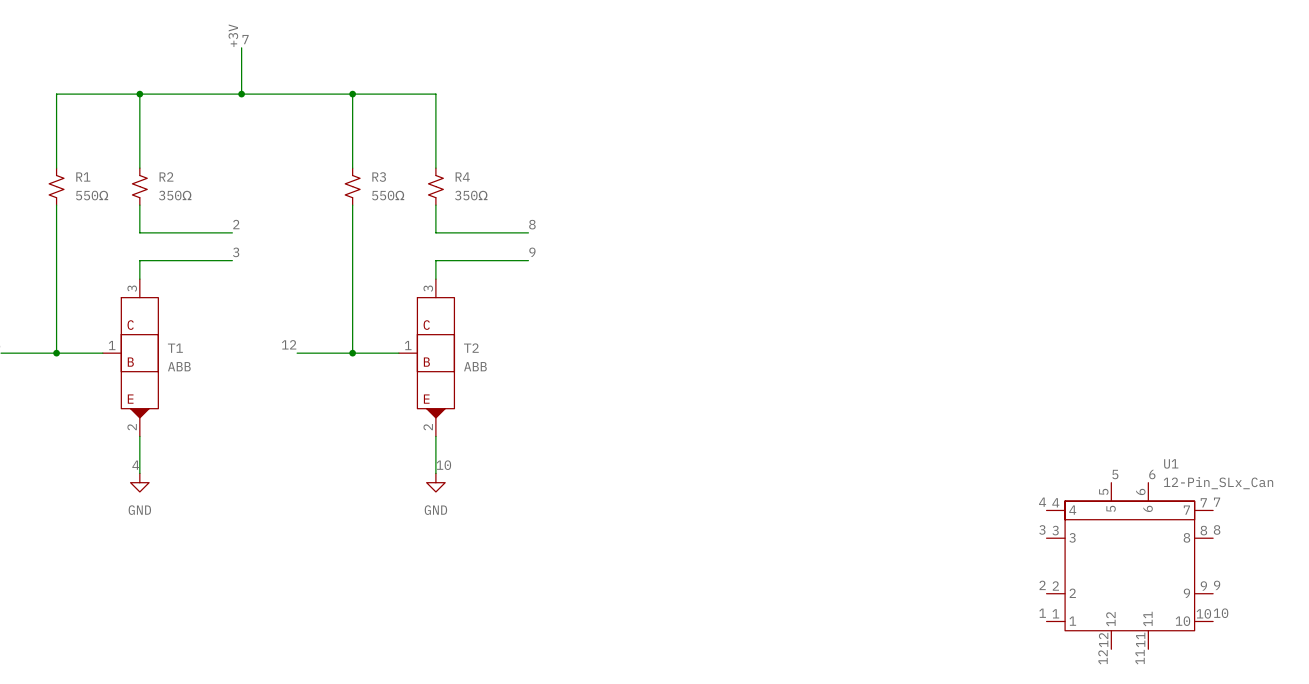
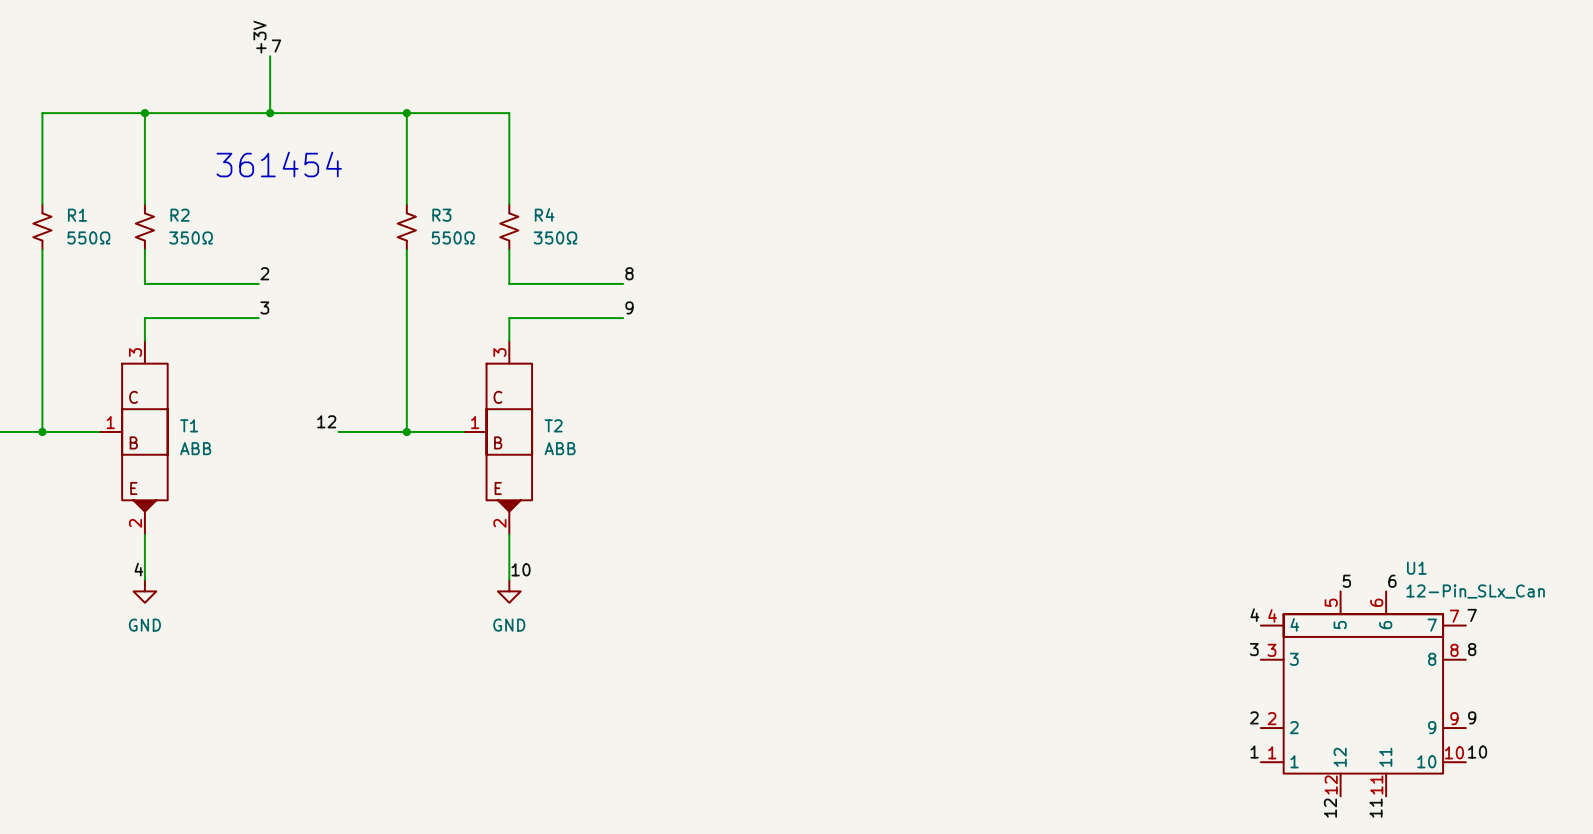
text: none -> 361454 (279, 164)

